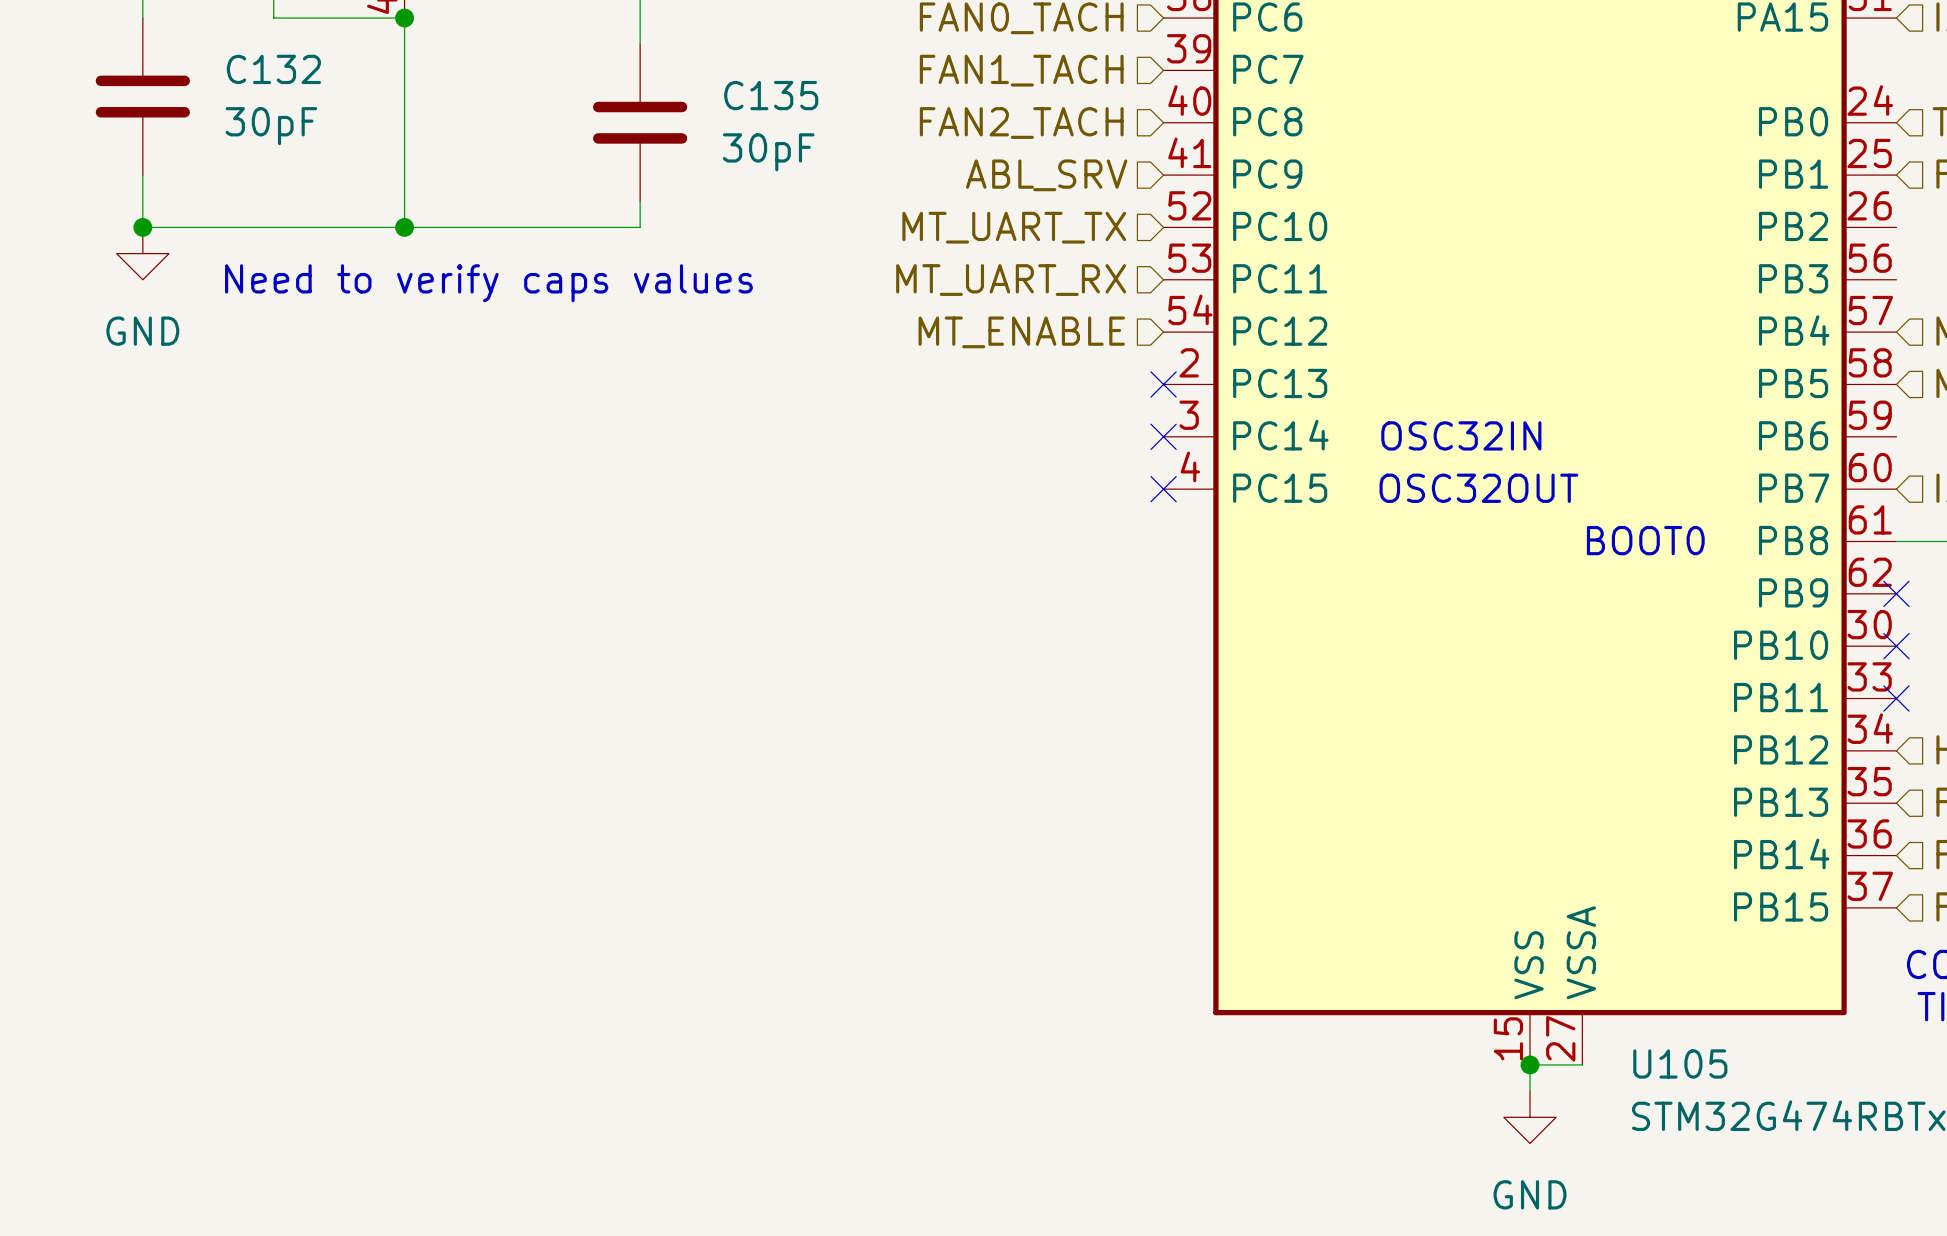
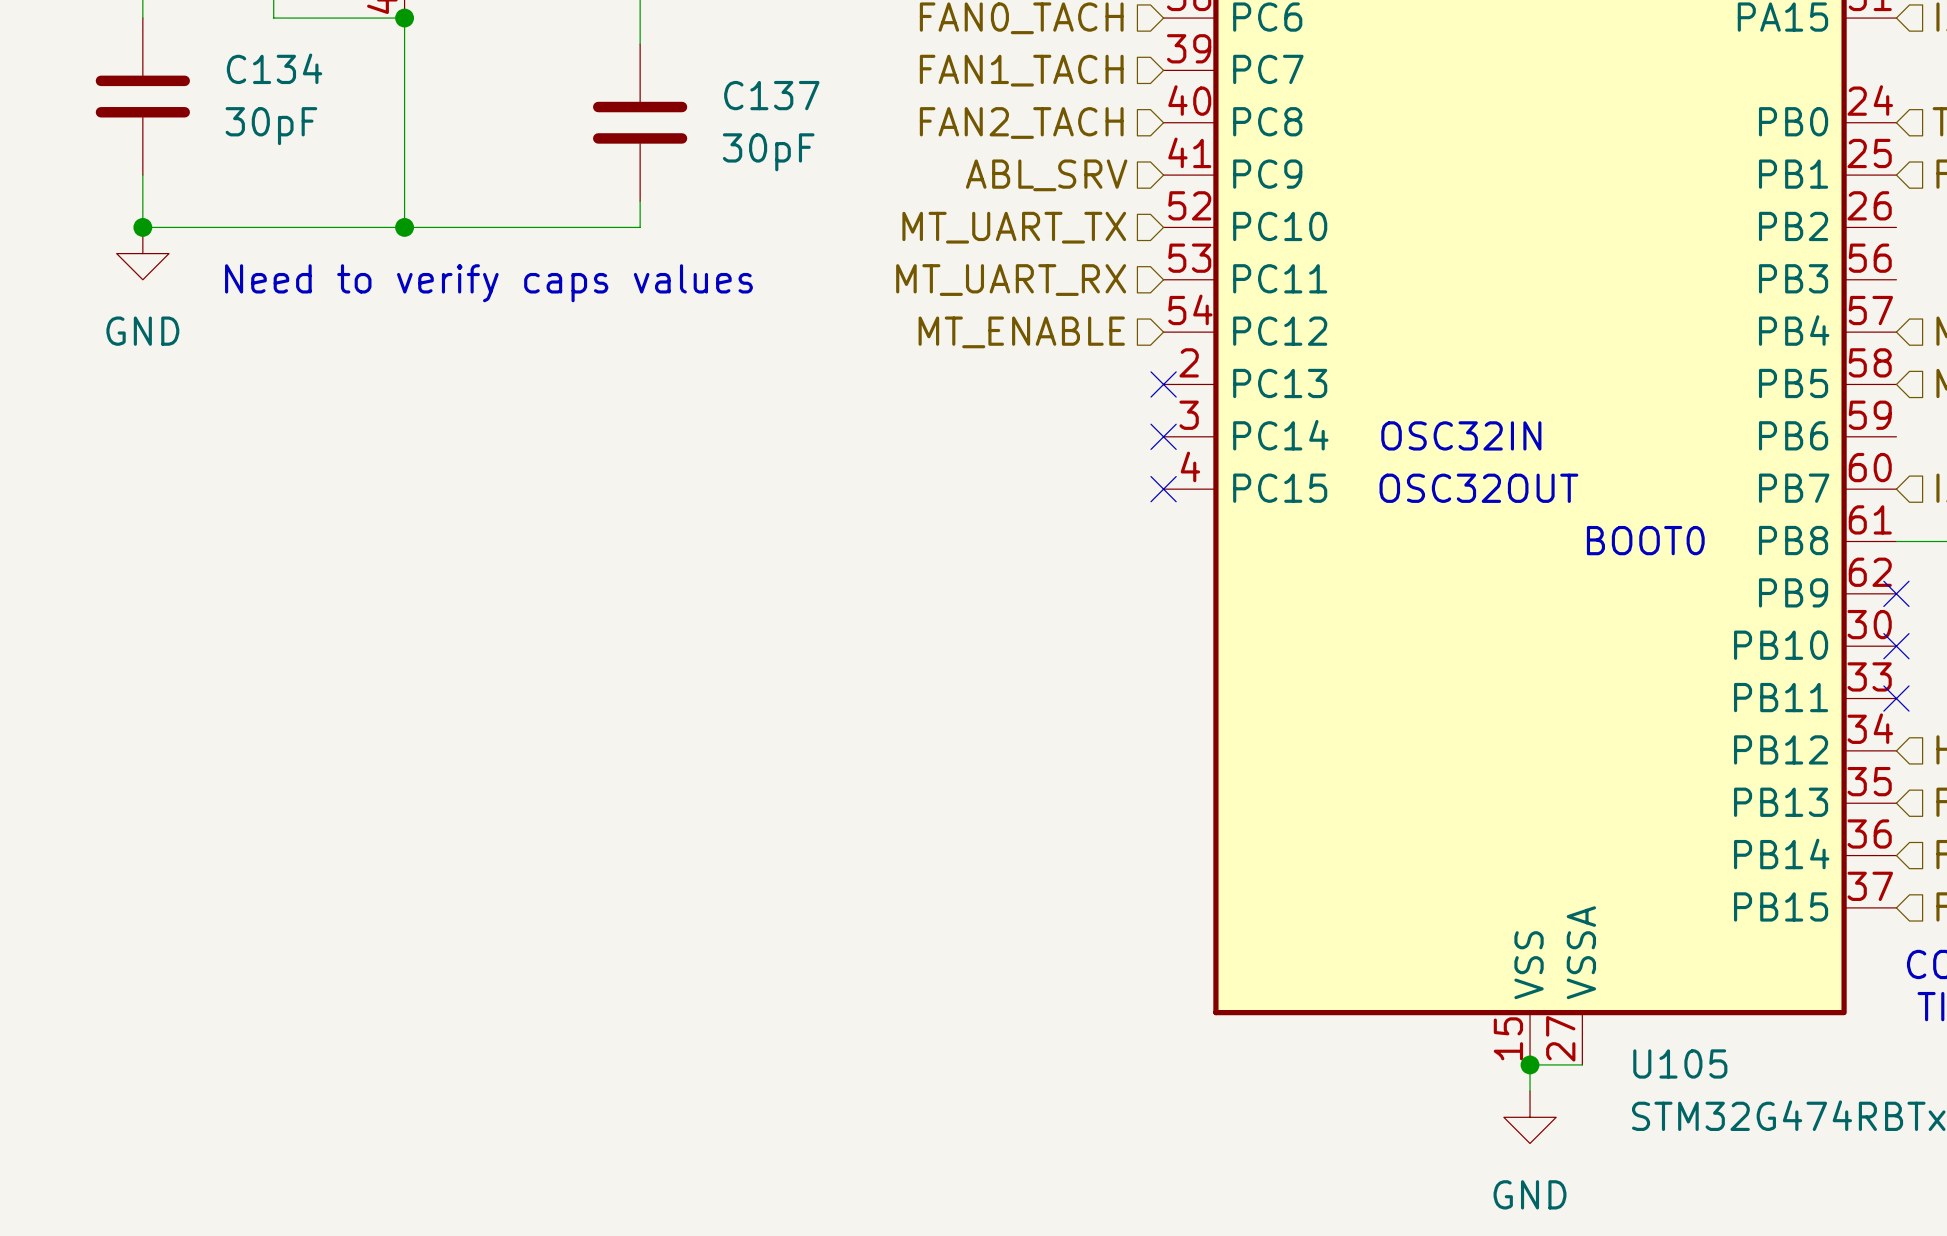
C132 name: C132 (273, 69) -> C134 (274, 68)
C135 name: C135 (771, 95) -> C137 (771, 95)

